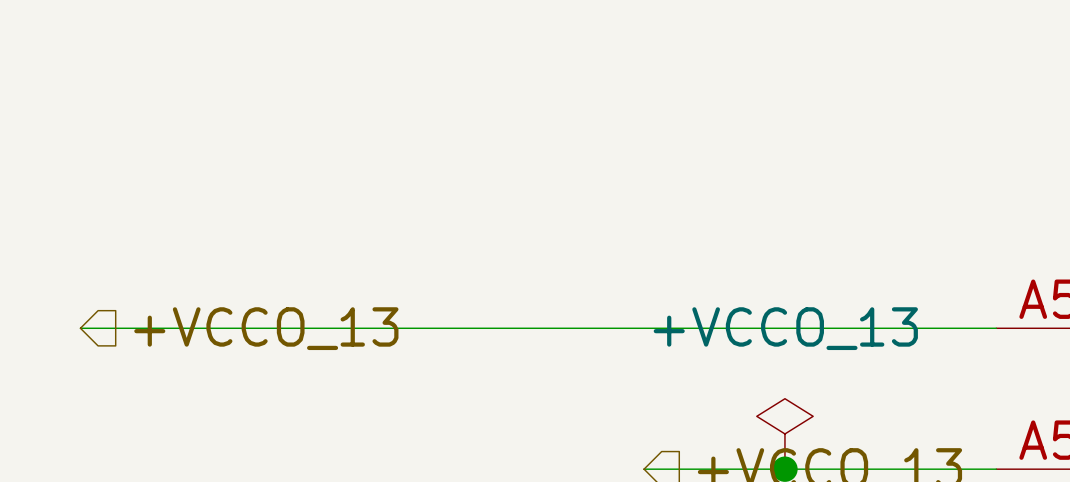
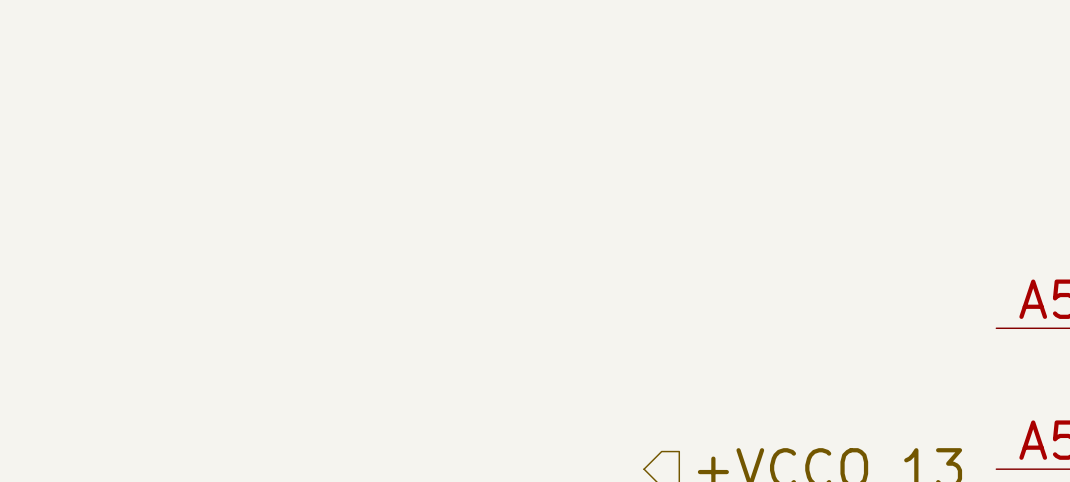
wire: (80, 328) (996, 328) -> none
hierarchical label: +VCCO_13 (266, 328) -> none
power symbol: +VCCO_13 (784, 433) -> none
wire: (644, 469) (996, 469) -> none
junction: (784, 469) -> none

